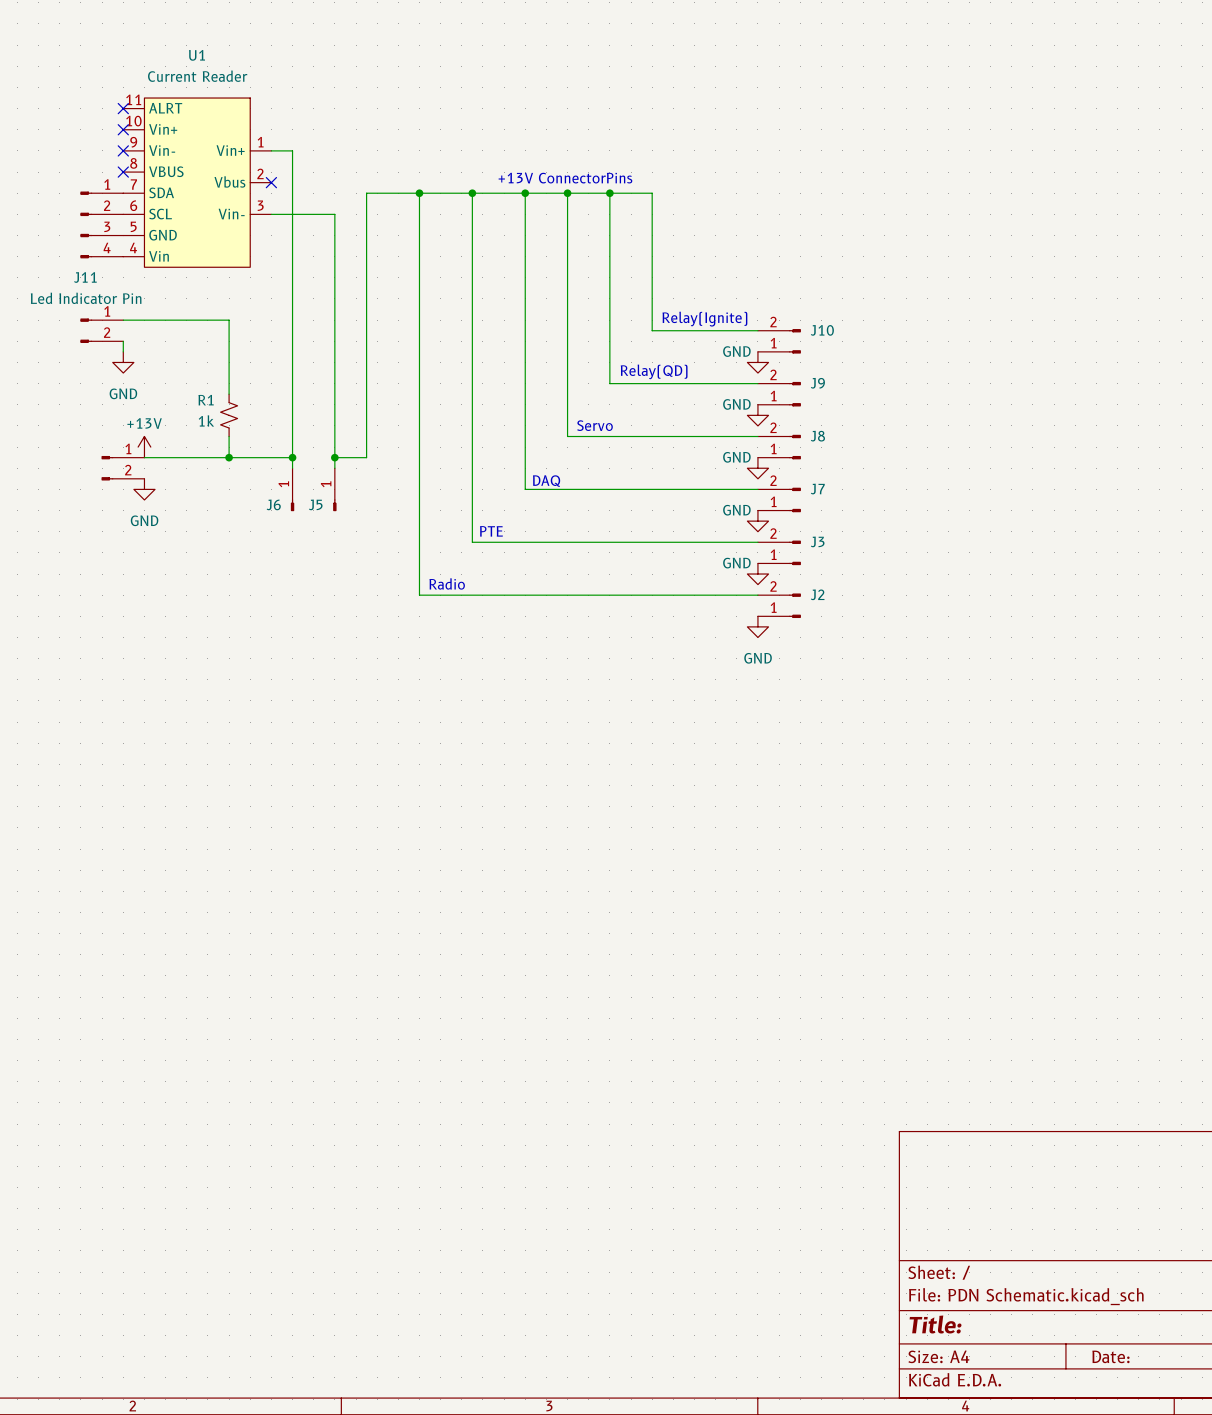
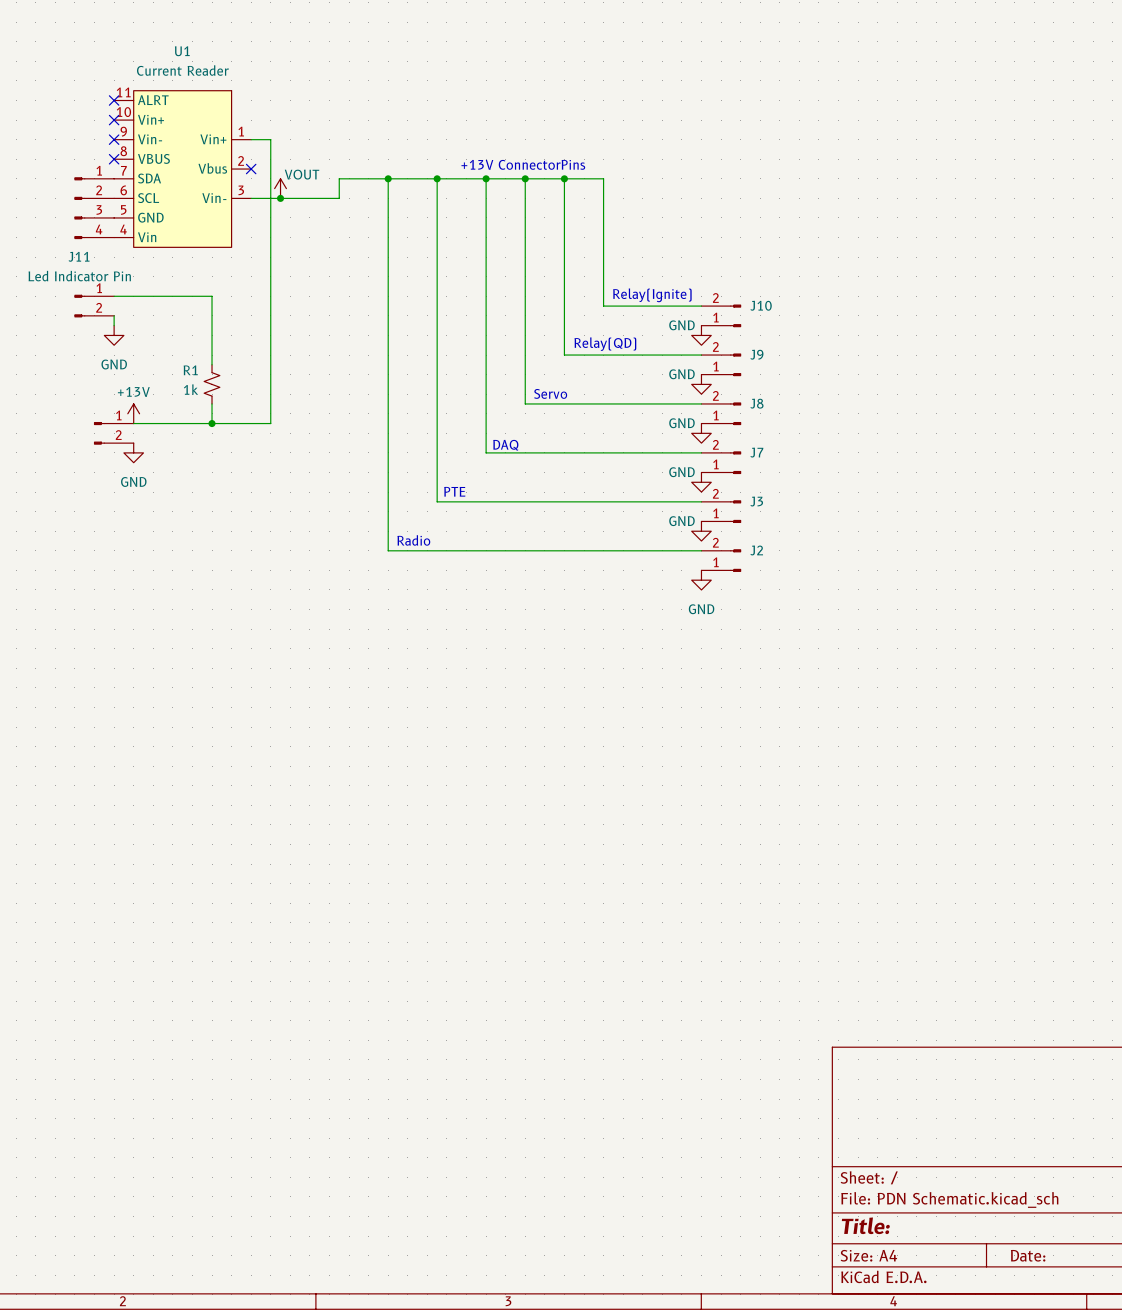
power symbol: none -> VOUT (280, 188)
junction: none -> (280, 198)
wire: (334, 214) (334, 468) -> none
wire: (366, 214) (366, 457) (334, 457) -> (339, 198) (309, 198)
wire: (292, 457) (292, 468) -> none
junction: (292, 457) -> none
junction: (334, 457) -> none
J6: (292, 489) -> none
J5: (334, 489) -> none

